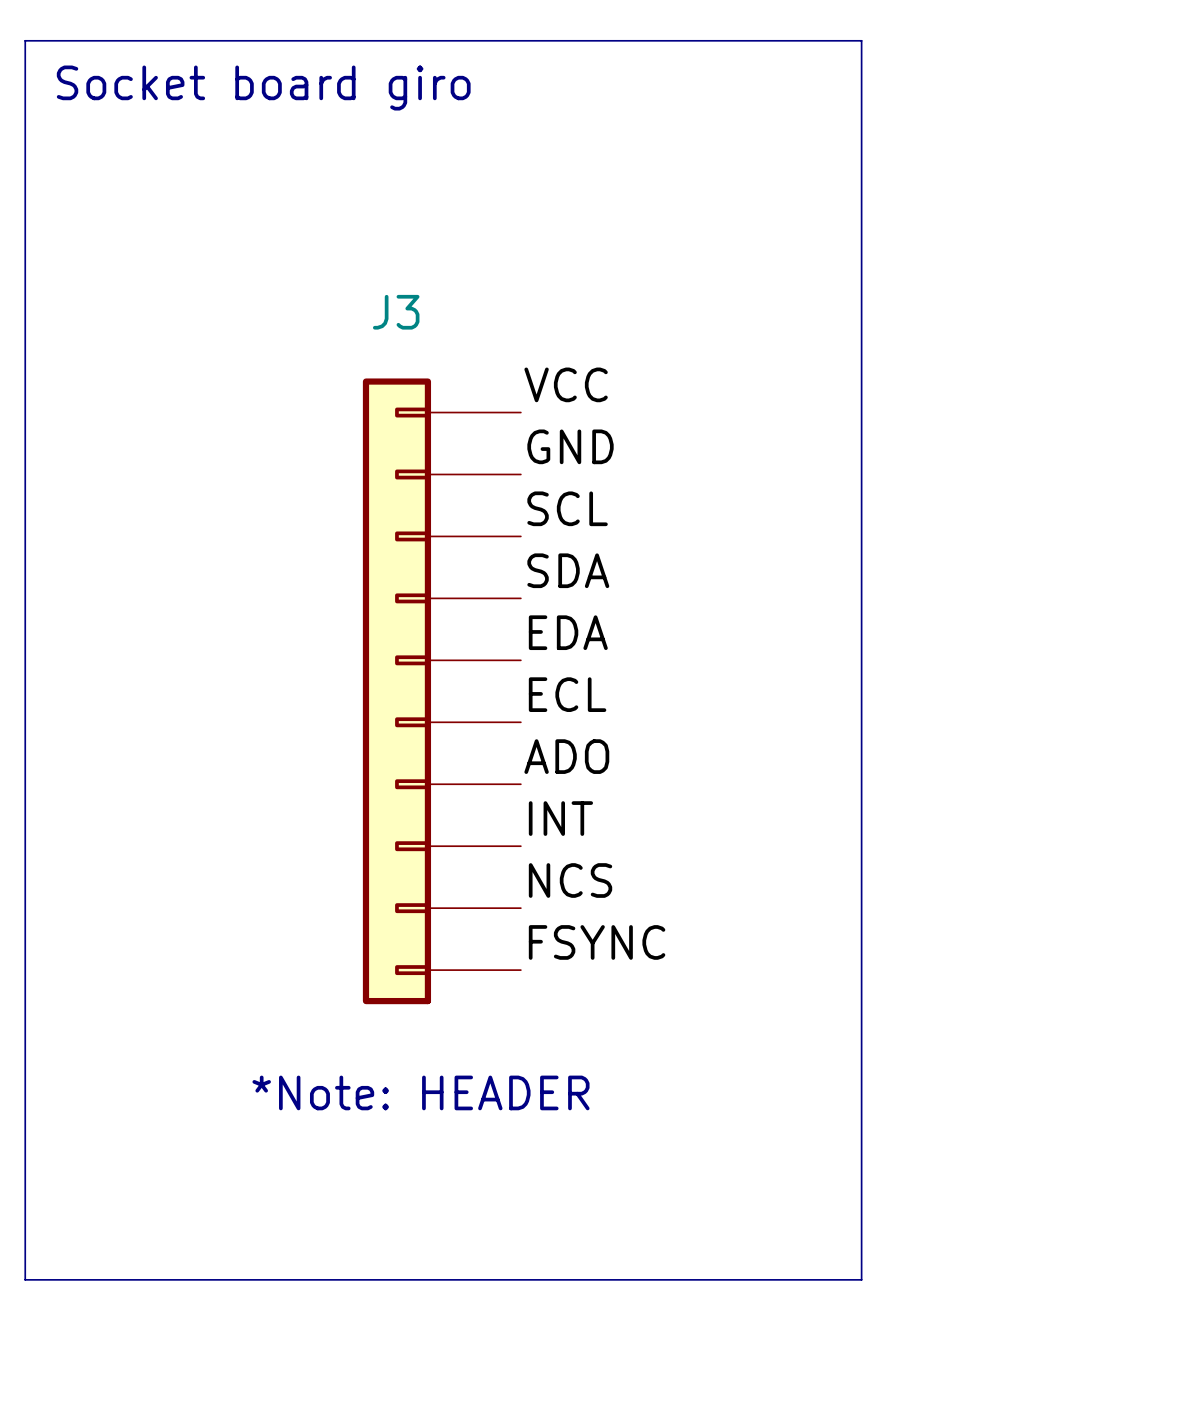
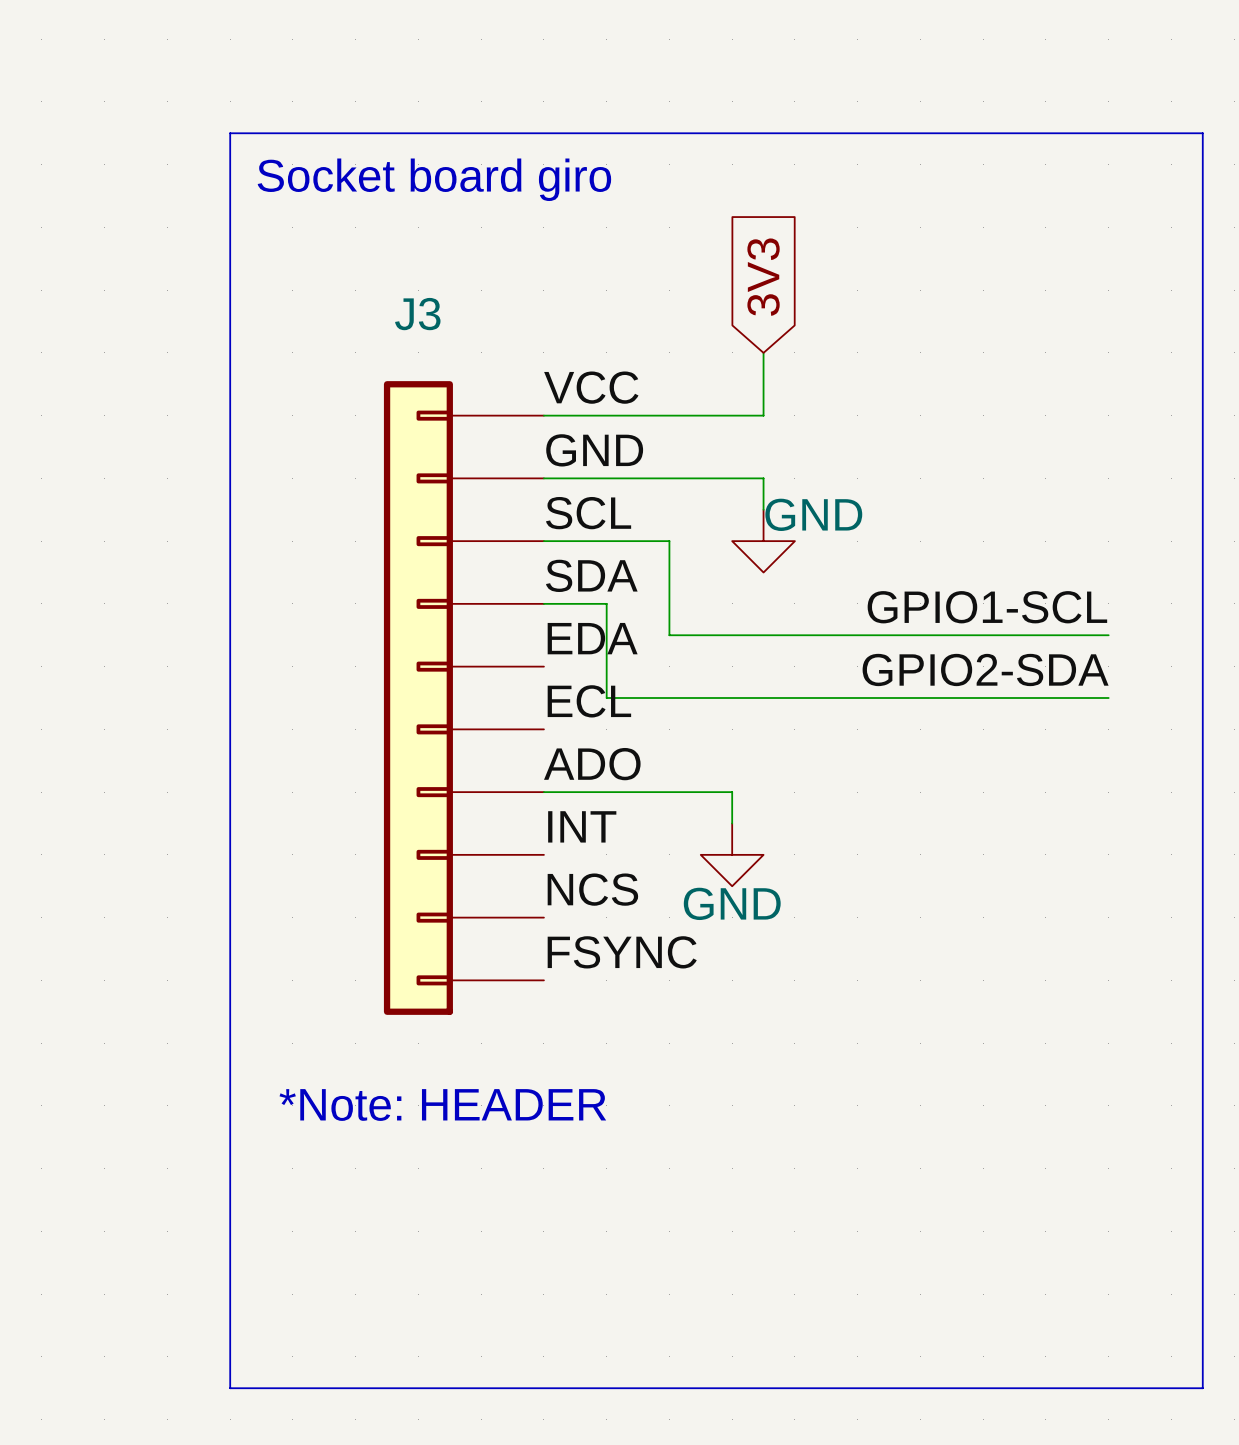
line: (25, 40) (861, 40) (861, 1279) (25, 1279) (25, 40) -> (230, 133) (230, 1388) (1202, 1388) (1202, 133) (230, 133)
text position: Socket board giro (263, 88) -> Socket board giro (434, 179)
global label: none -> 3V3 (763, 277)
wire: none -> (763, 352) (763, 415) (543, 415)
wire: none -> (543, 478) (763, 478) (763, 509)
wire: none -> (543, 541) (669, 541) (669, 635) (1108, 635)
power symbol: none -> GND (763, 541)
wire: none -> (543, 603) (606, 603) (606, 698) (1108, 698)
label: none -> GPIO1-SCL (987, 607)
label: none -> GPIO2-SDA (985, 669)
wire: none -> (543, 792) (732, 792) (732, 823)
power symbol: none -> GND (732, 854)

